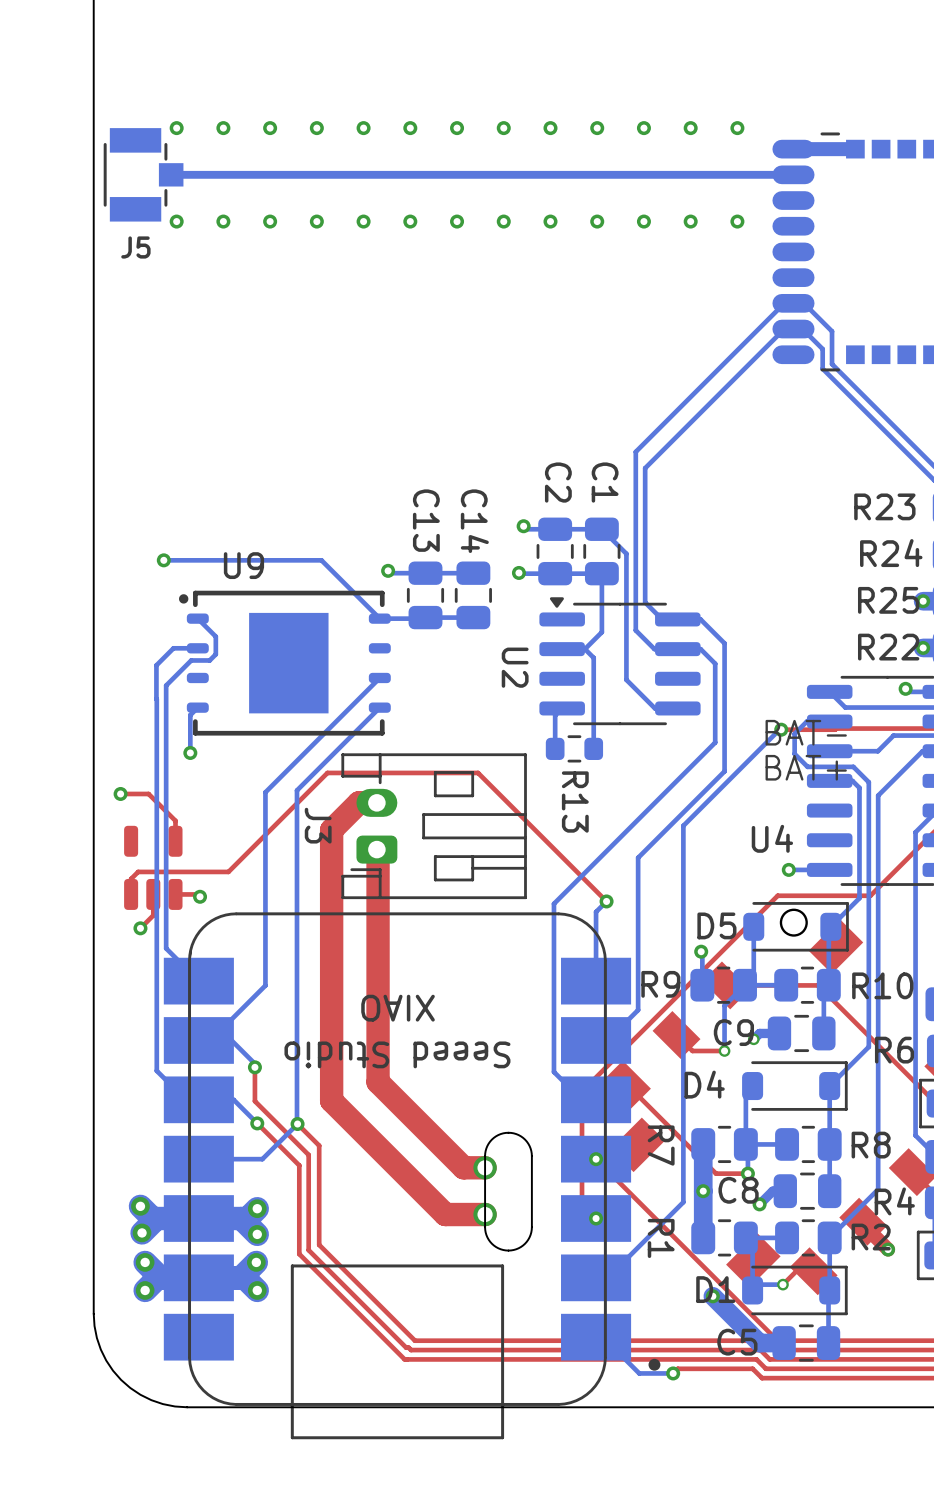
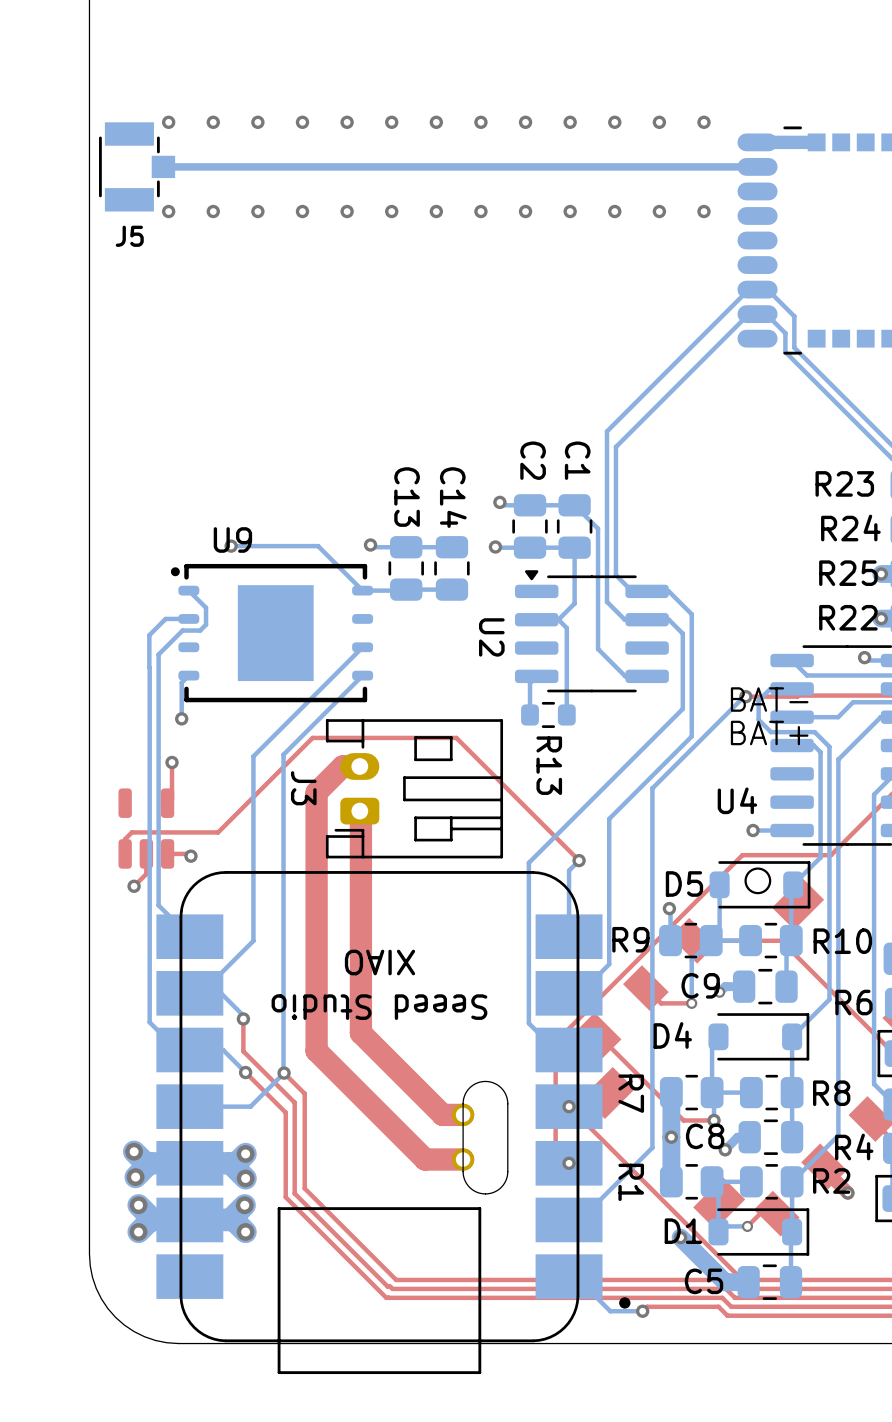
bottom track: (163, 560) (321, 560) (333, 572) -> (231, 546) (318, 546)
via position: (163, 560) -> (231, 546)
top track: (120, 793) (148, 793) (175, 820) (175, 841) -> (172, 762) (172, 798) (167, 803)
via position: (120, 793) -> (172, 762)

